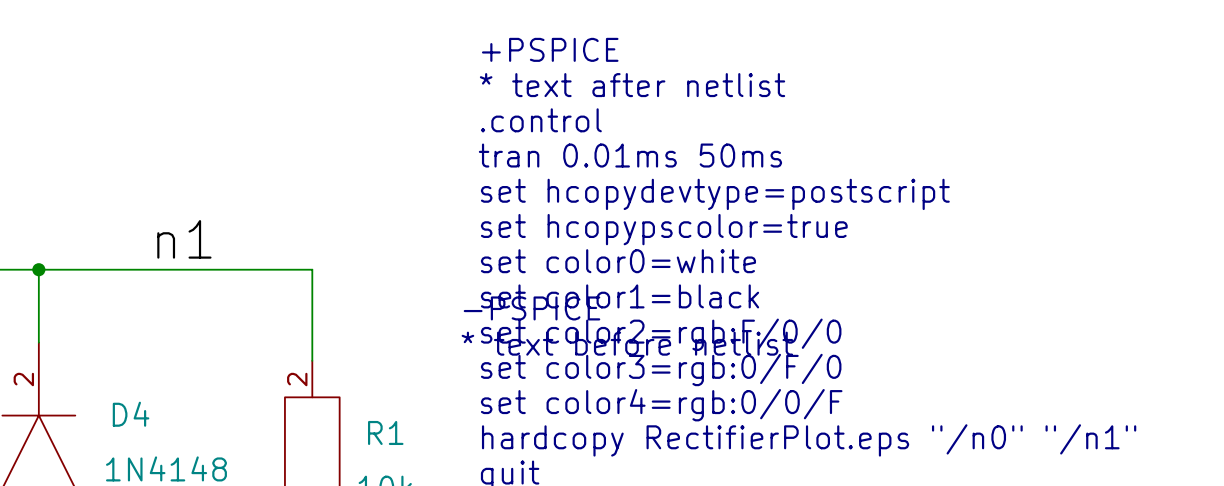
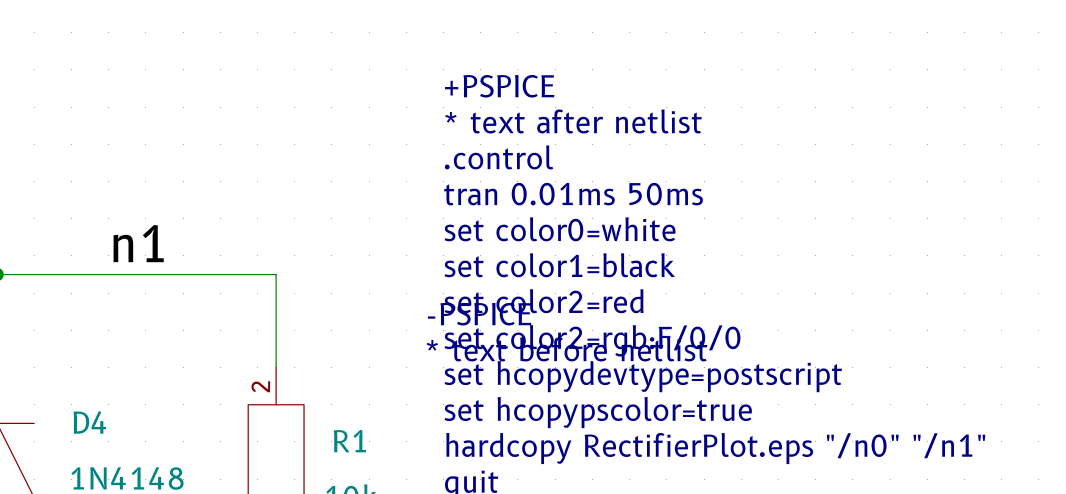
text: +PSPICE (550, 49) -> none
text: * text after netlist (632, 85) -> +PSPICE (499, 86)
text: .control (541, 120) -> * text after netlist (573, 121)
text: tran 0.01ms 50ms (630, 155) -> .control (499, 157)
text: set hcopydevtype=postscript (715, 194) -> tran 0.01ms 50ms (573, 194)
text: set hcopypscolor=true (664, 229) -> set color0=white (560, 229)
text: set color0=white (618, 261) -> set color1=black (559, 265)
text: set color1=black (620, 296) -> set color2=red (544, 301)
text: set color3=rgb:0/F/0 (661, 369) -> set hcopydevtype=postscript (643, 376)
text: set color4=rgb:0/0/F (661, 405) -> set hcopypscolor=true (598, 412)

